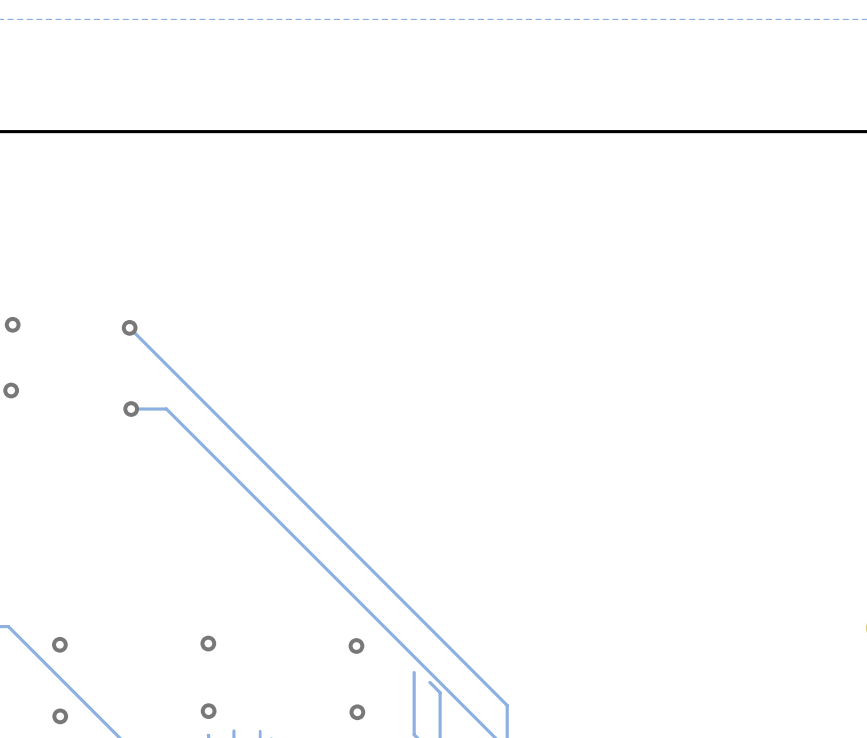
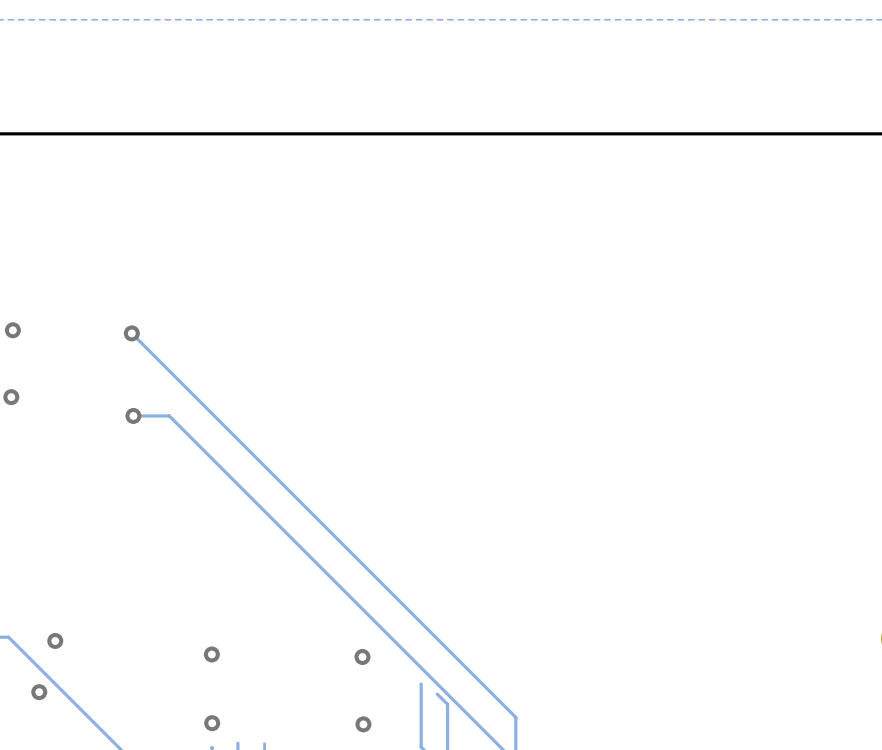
via position: (59, 644) -> (55, 640)
via: none -> (39, 692)
via: (60, 716) -> none

